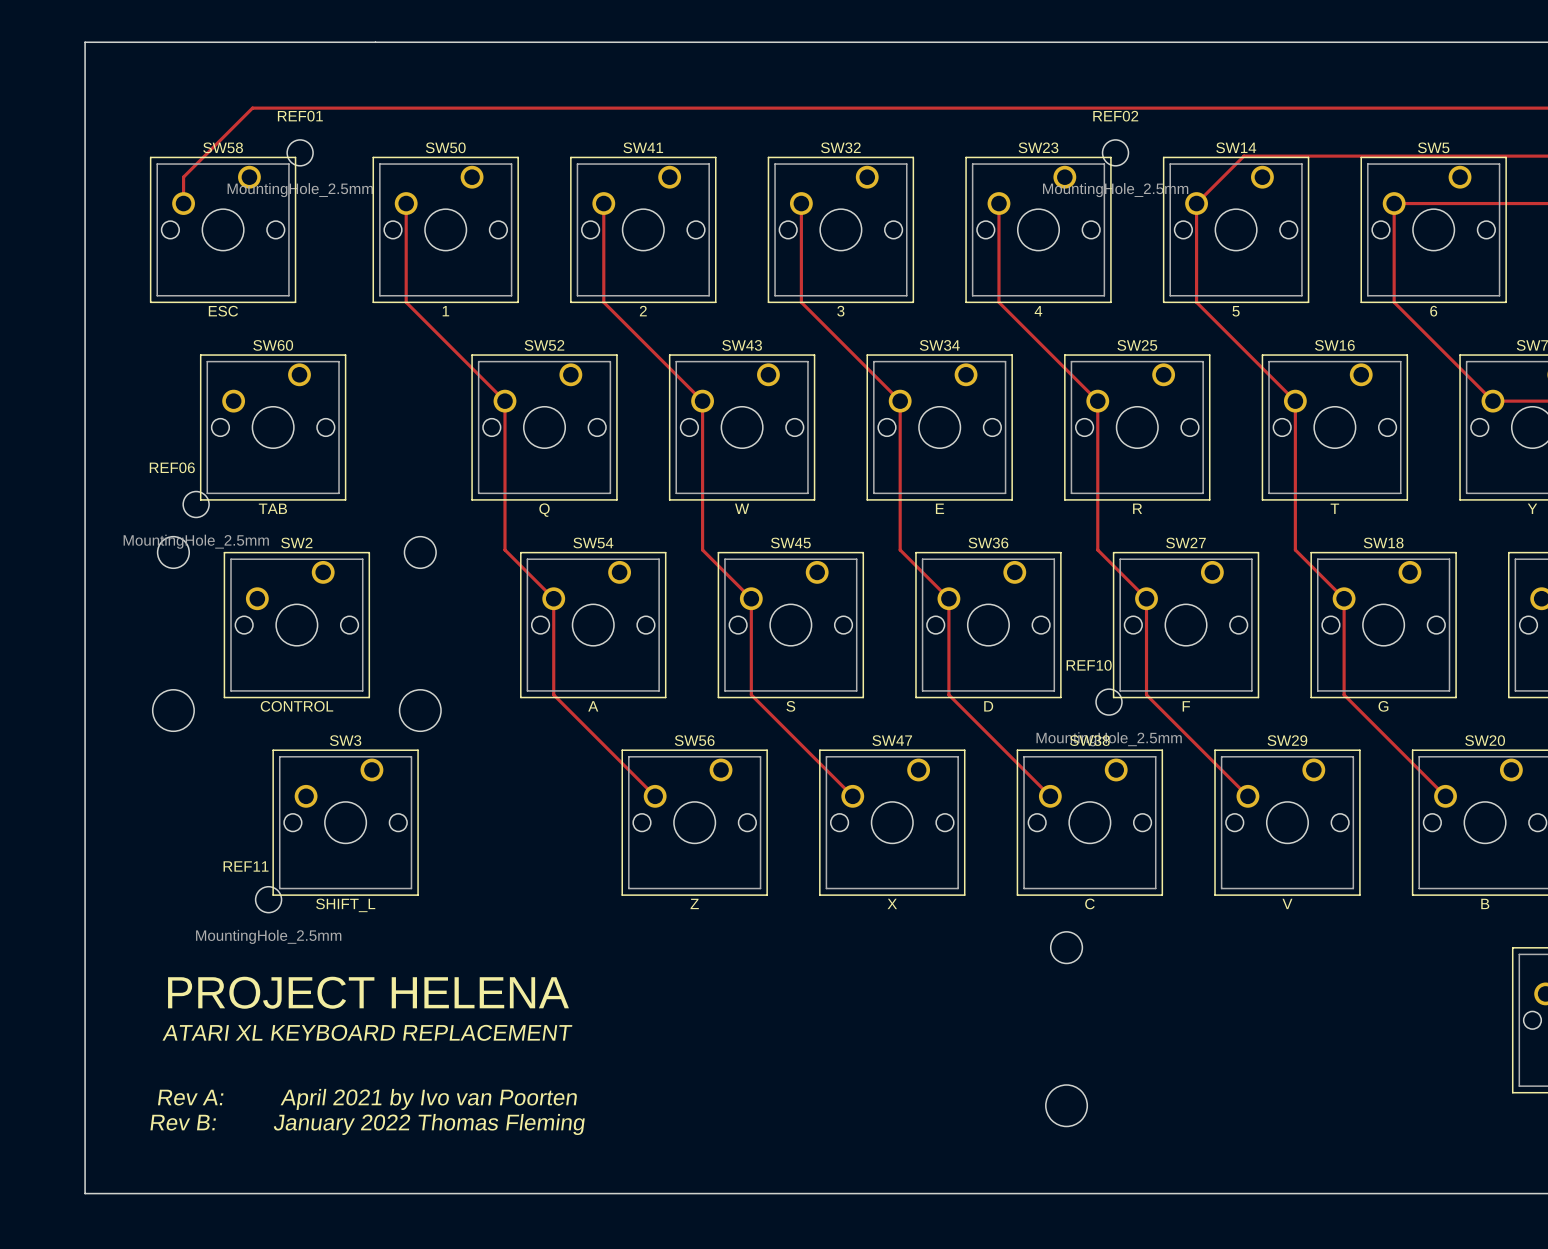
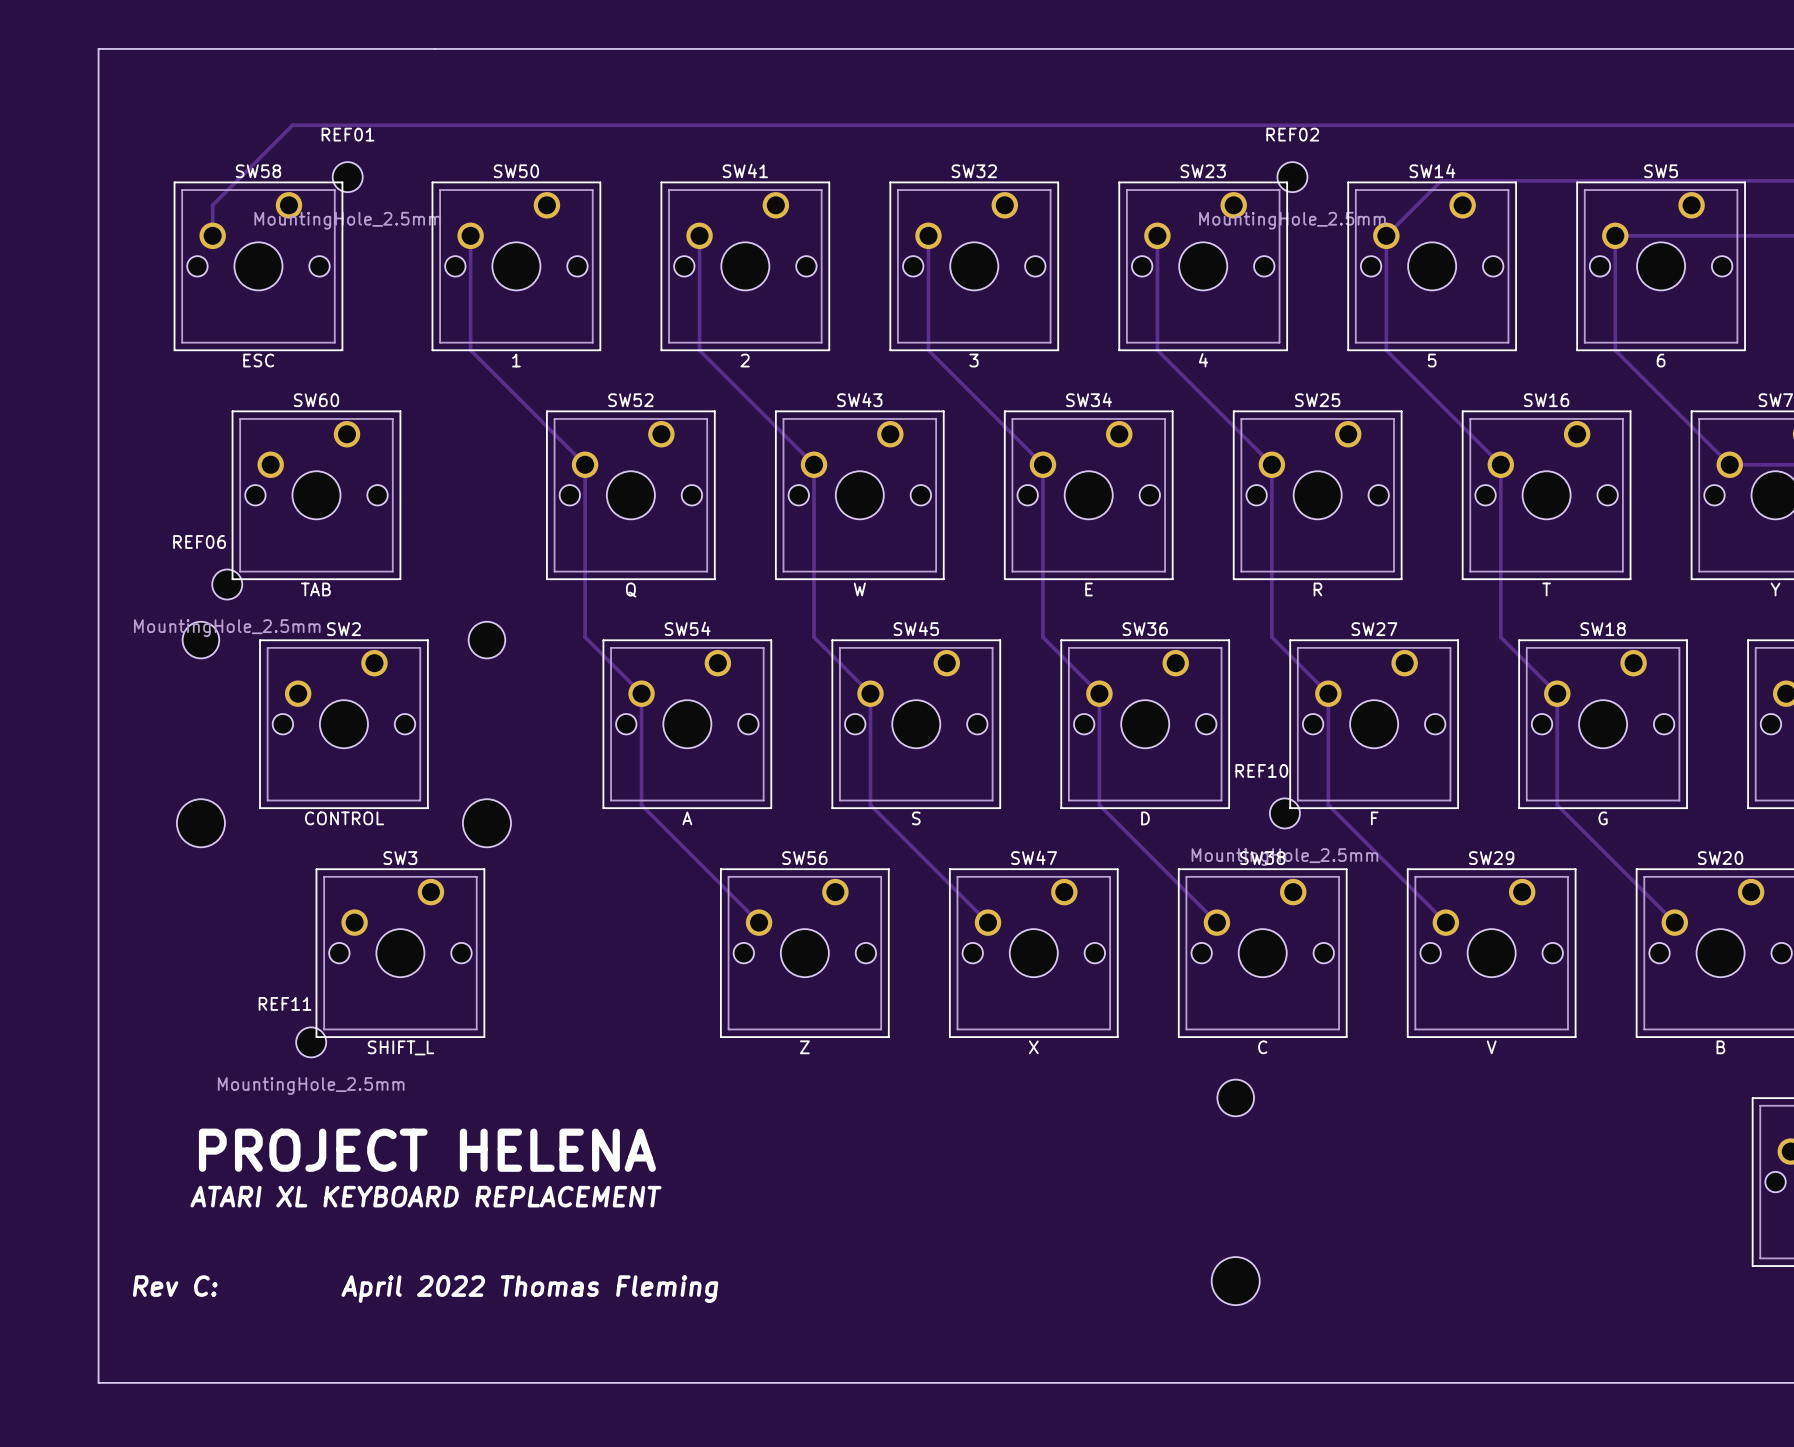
text: Rev A: April 2021 by Ivo van Poorten (367, 1099) -> none
text: none -> Rev C: April 2022 Thomas Fleming (425, 1289)
text: Rev B: January 2022 Thomas Fleming (367, 1124) -> none

